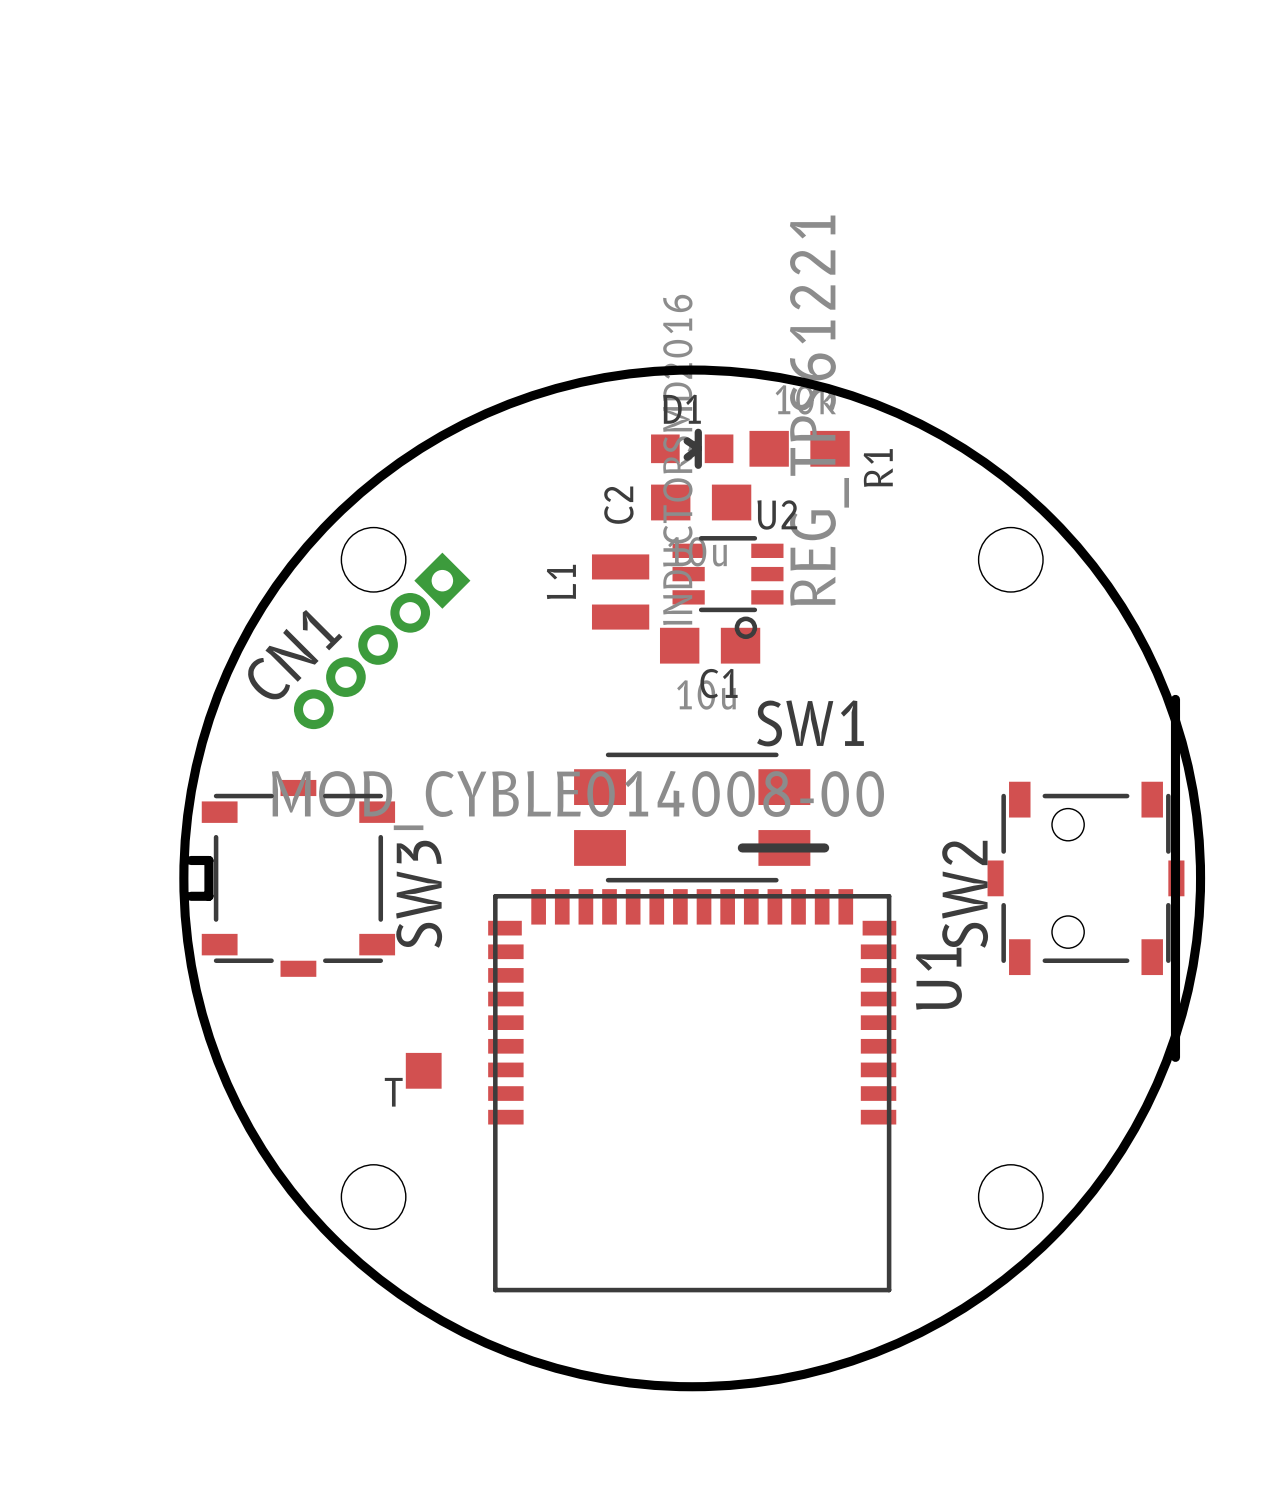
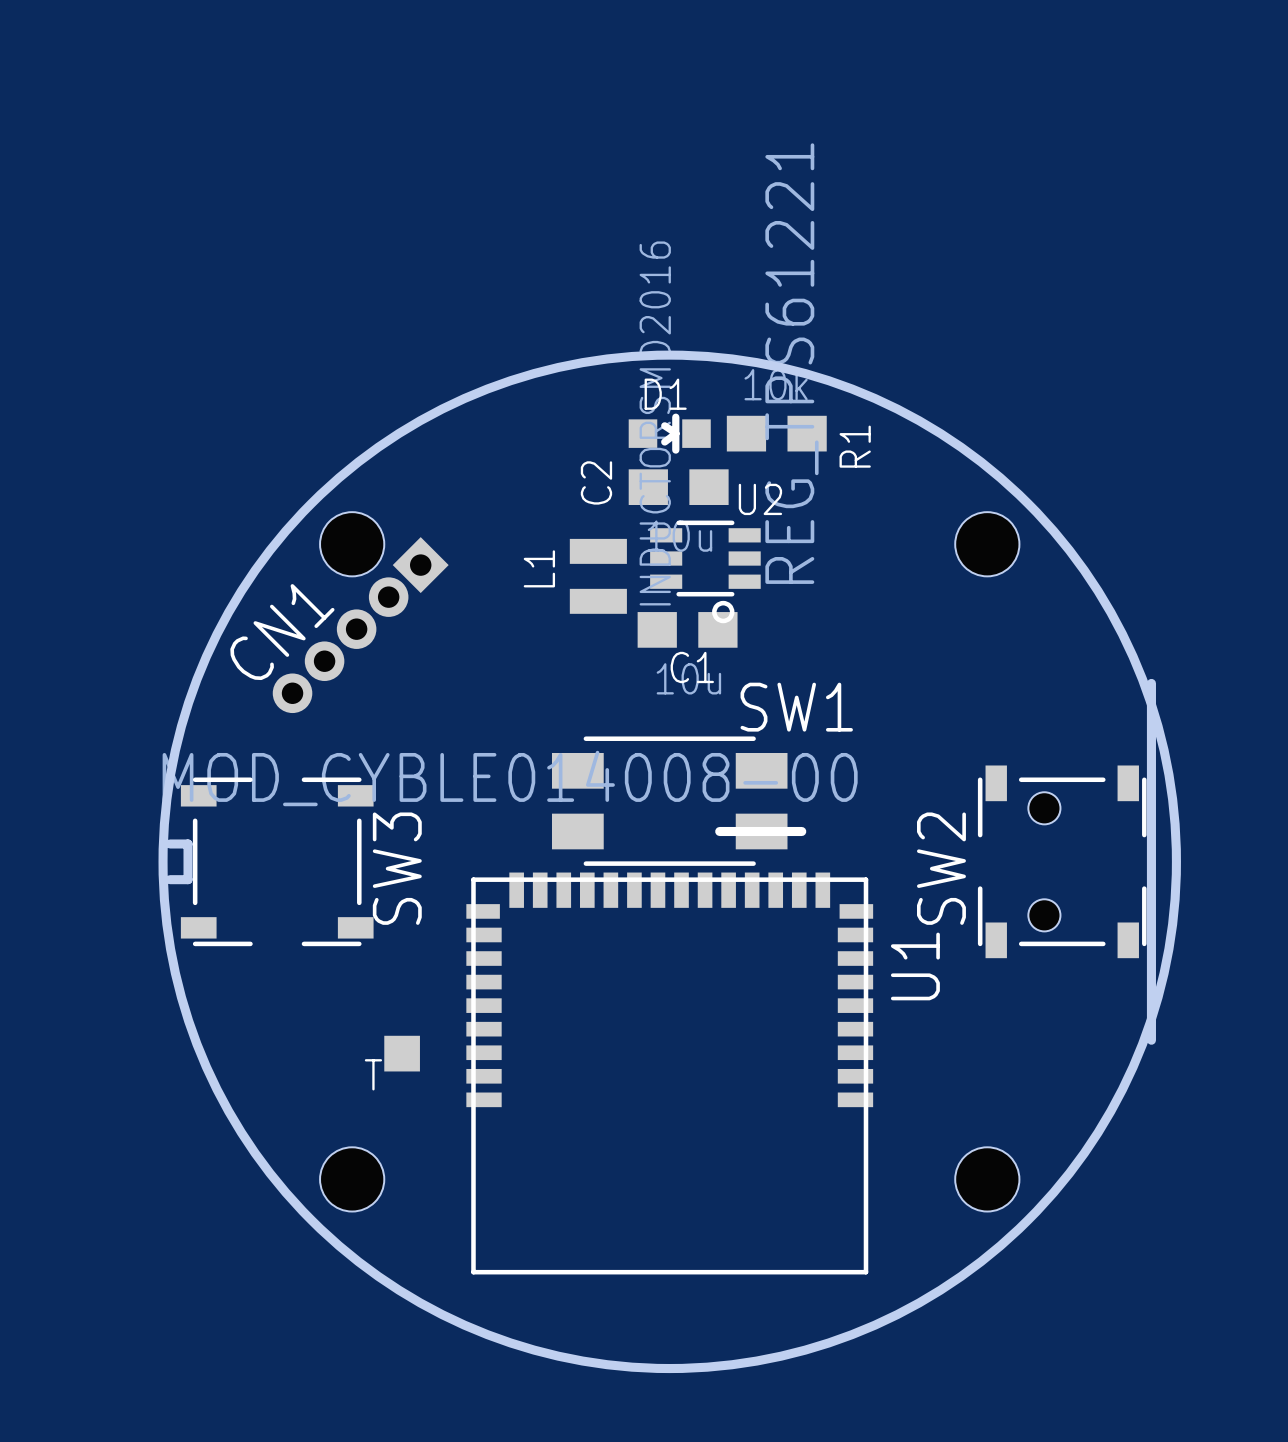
SW3 footprint: [201, 779, 396, 977] -> [180, 777, 374, 947]
SW2 footprint: [987, 781, 1185, 976] -> [977, 765, 1147, 959]

